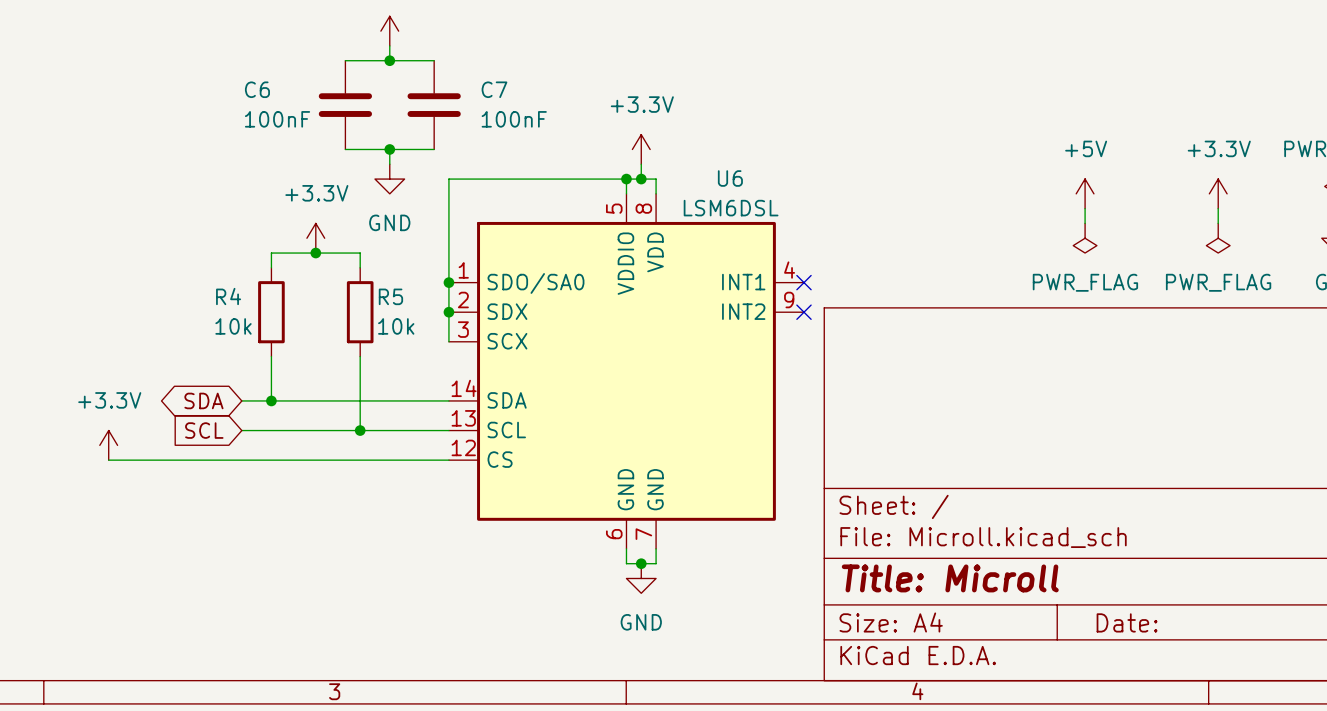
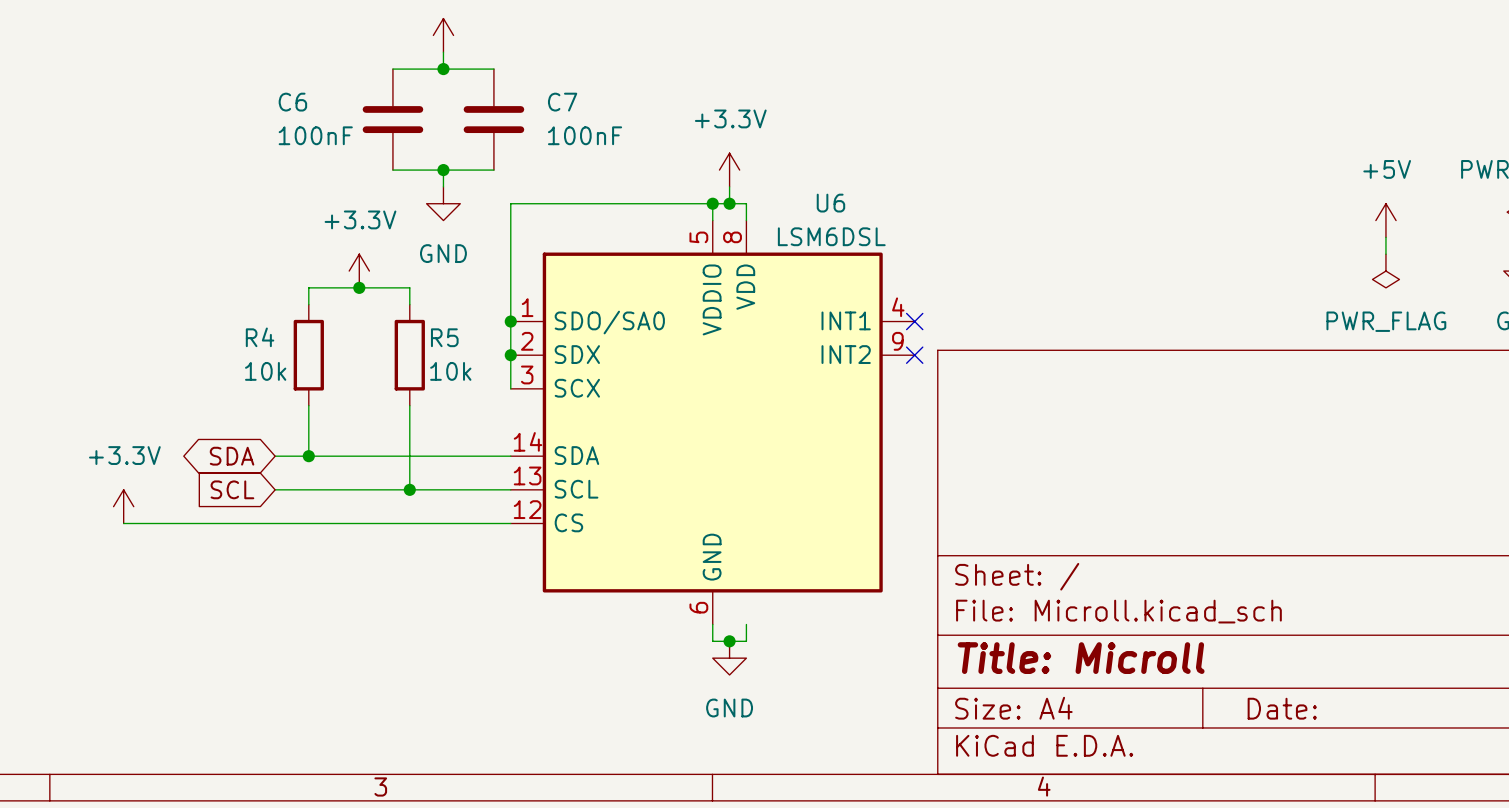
U6 symbol: [448, 193, 805, 549] -> [510, 220, 915, 625]
power symbol: +5V (1085, 193) -> none
power symbol: +3.3V (1218, 193) -> +5V (1385, 220)
wire: (1085, 208) (1085, 223) -> none
power symbol: PWR_FLAG (1085, 238) -> none

